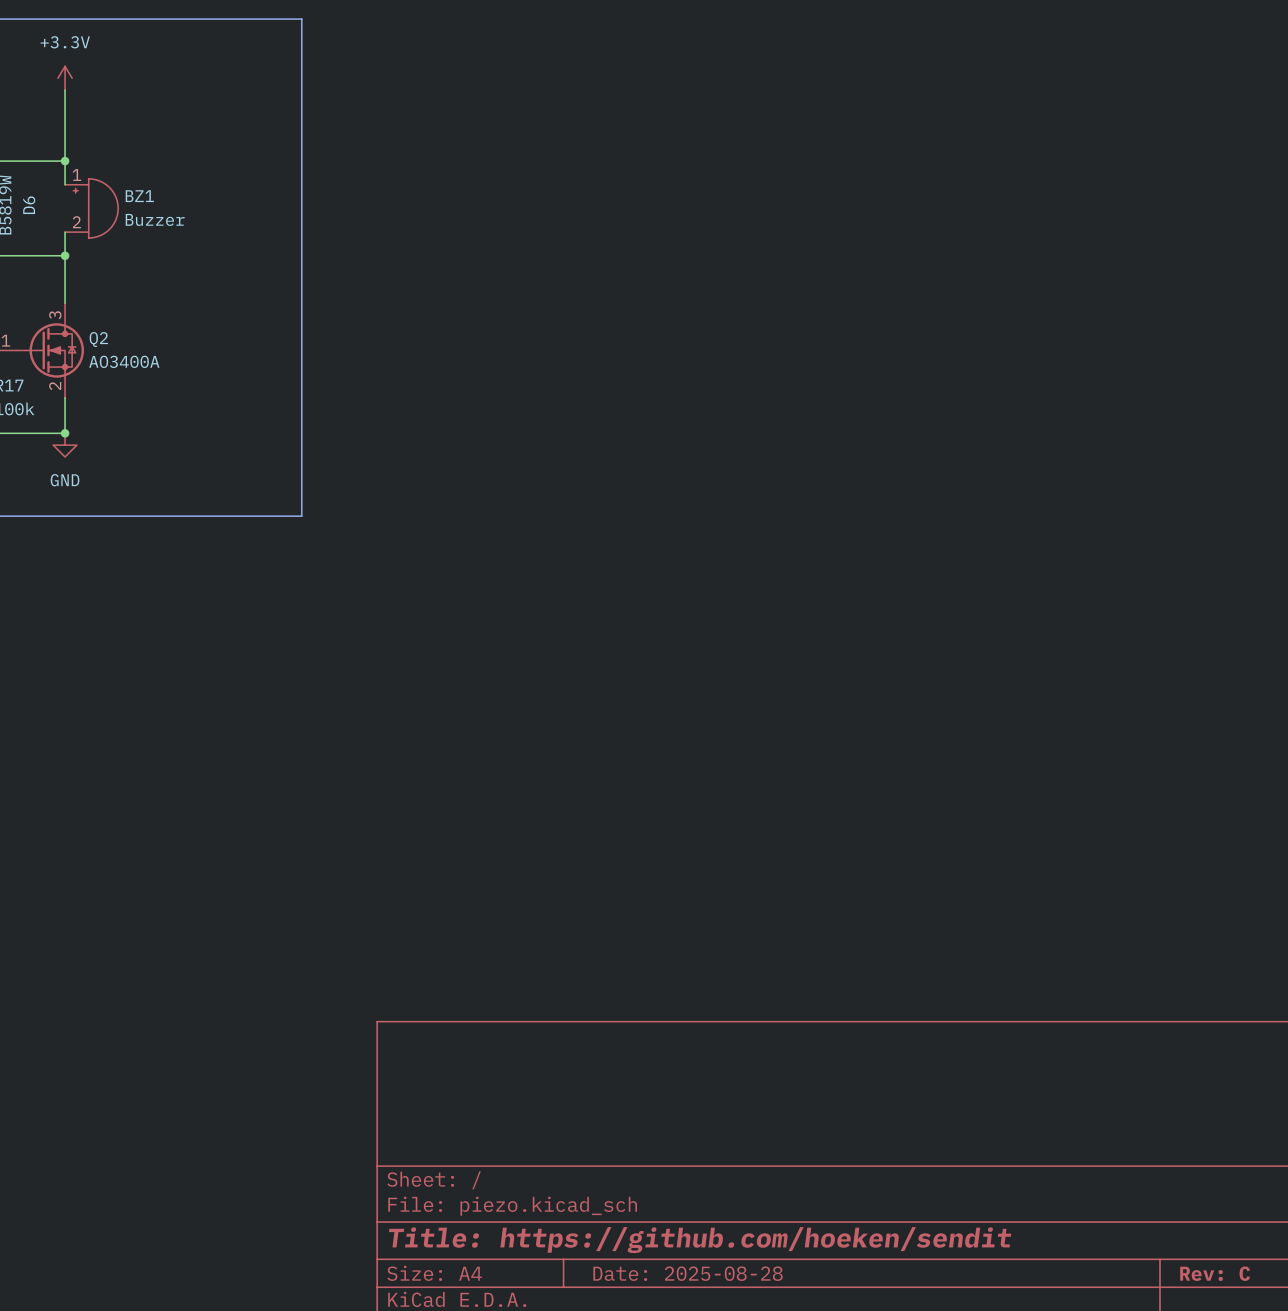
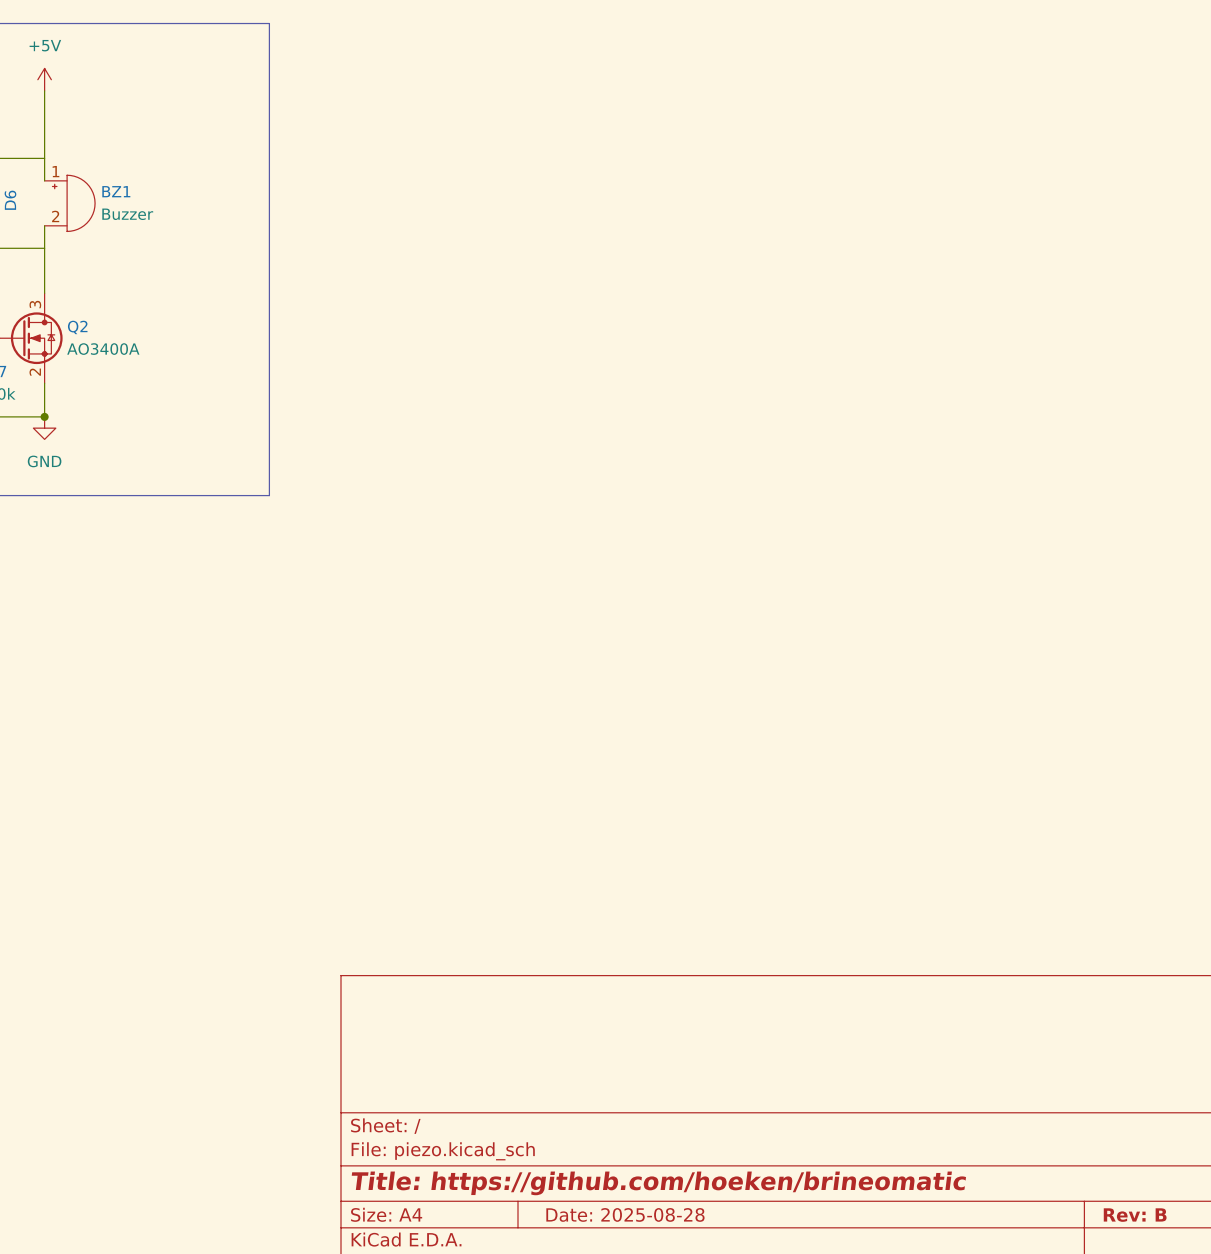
power symbol: +3.3V (65, 78) -> +5V (44, 79)
junction: (65, 161) -> none
junction: (65, 255) -> none
title block: Title: https://github.com/hoeken/sendit (700, 1240) -> Title: https://github.com/hoeken/brineomatic (658, 1183)
title block: Rev: C (1215, 1273) -> Rev: B (1135, 1215)

